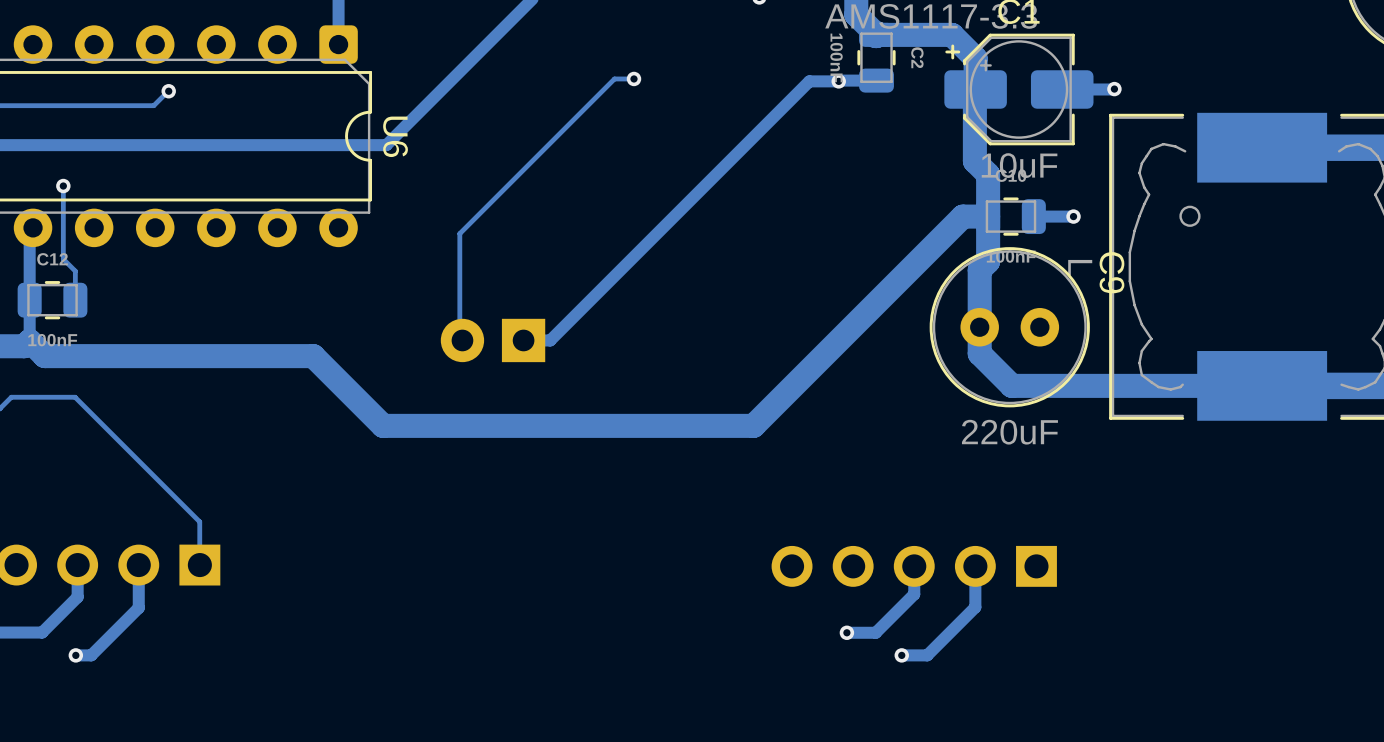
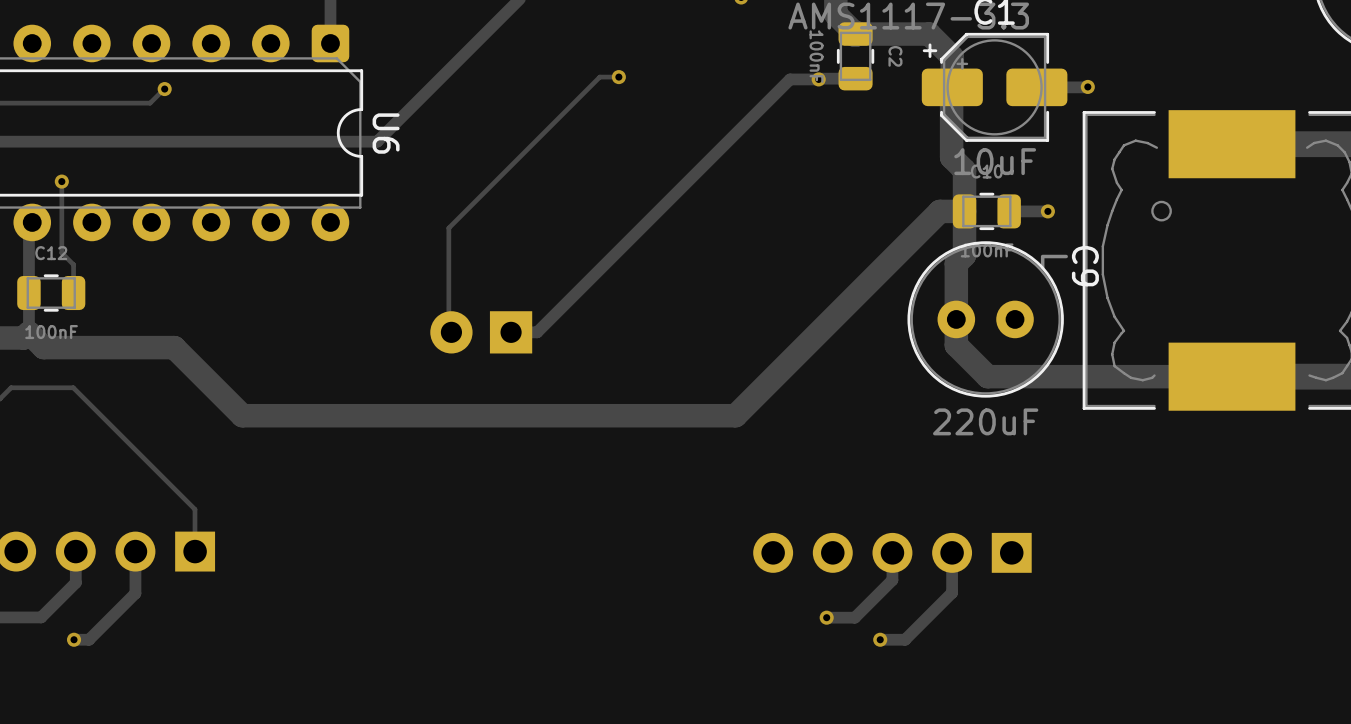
track: (178, 356) (313, 356) (383, 425) -> (174, 347) (242, 415) (373, 415)

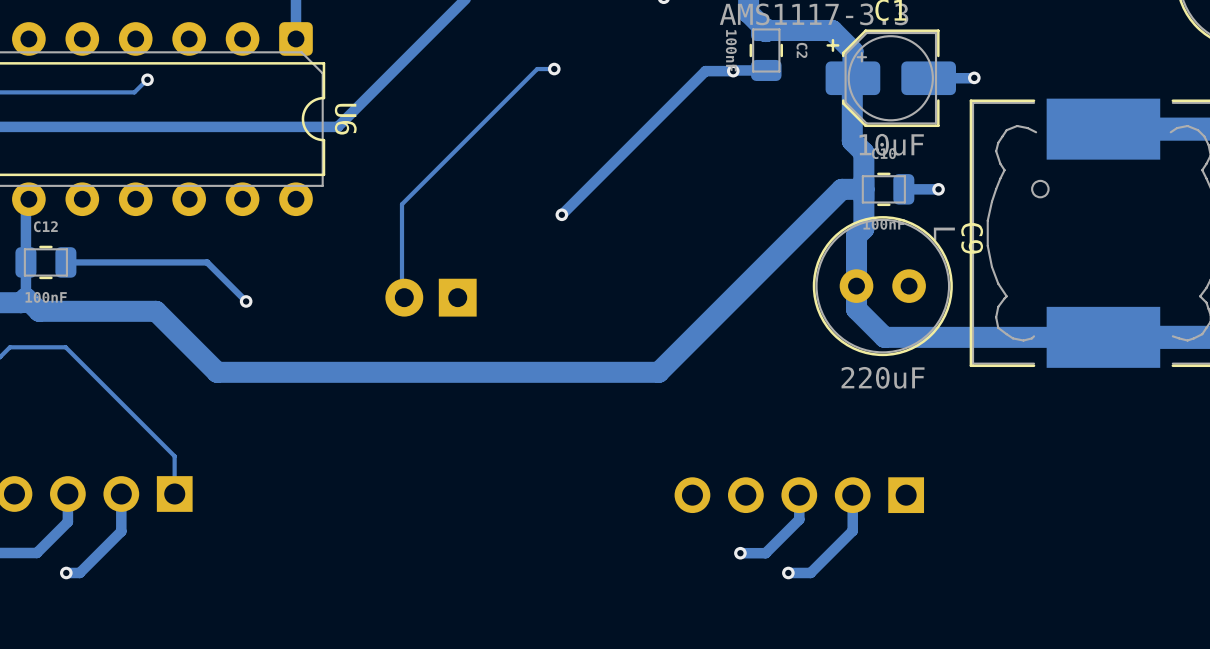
track: (790, 79) (537, 332) (511, 332) -> (707, 71) (561, 214)
track: (61, 181) (61, 252) (73, 264) (73, 293) -> (246, 301) (207, 262) (65, 262)
via: (61, 181) -> none
via: none -> (561, 214)
via: none -> (246, 301)

